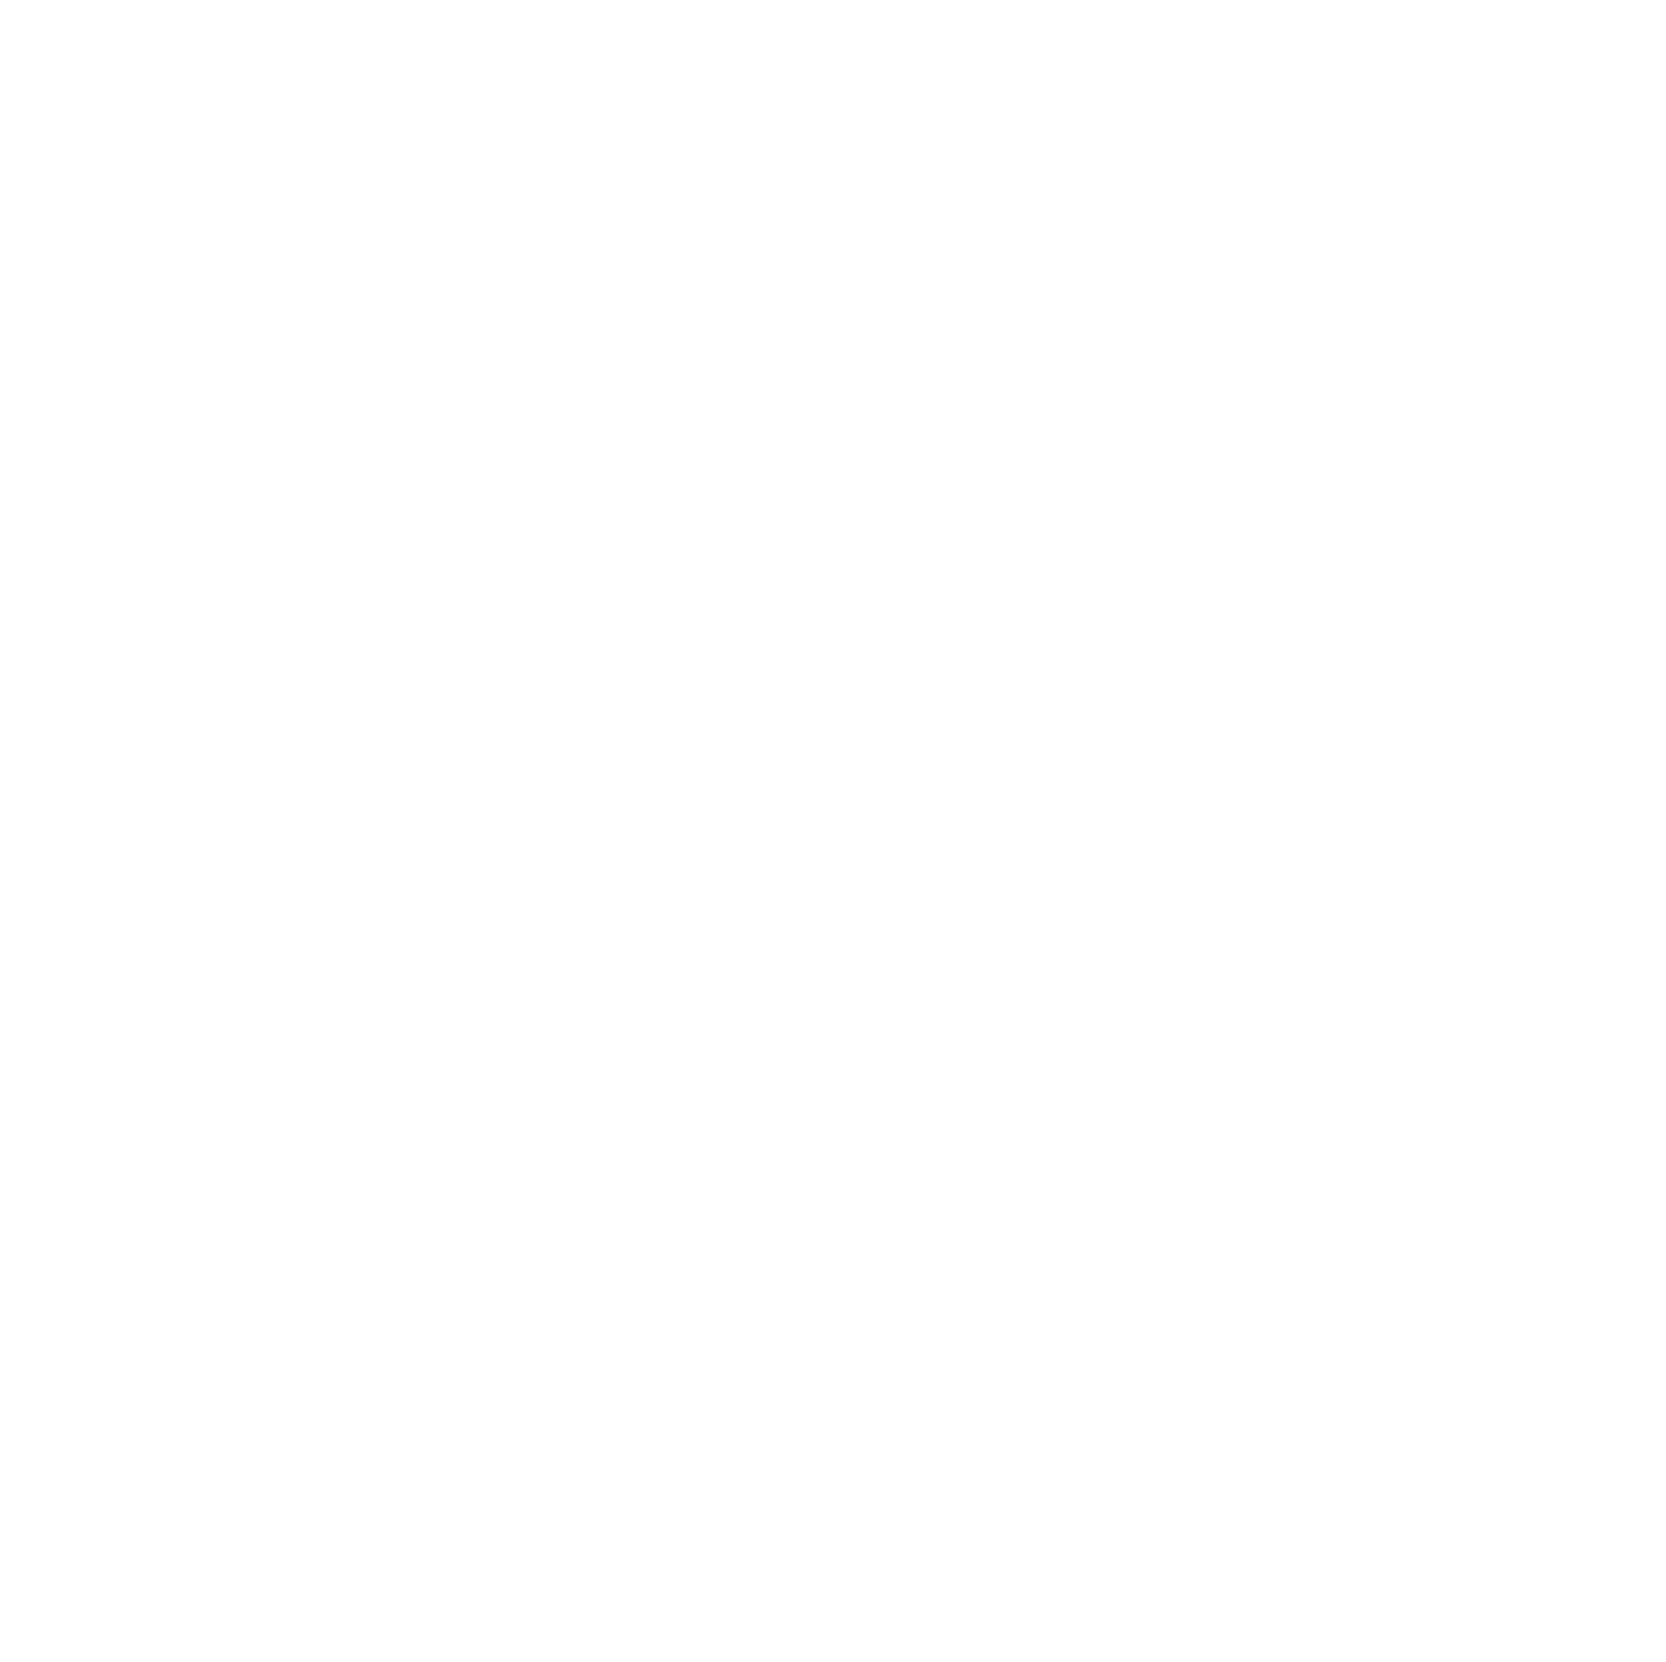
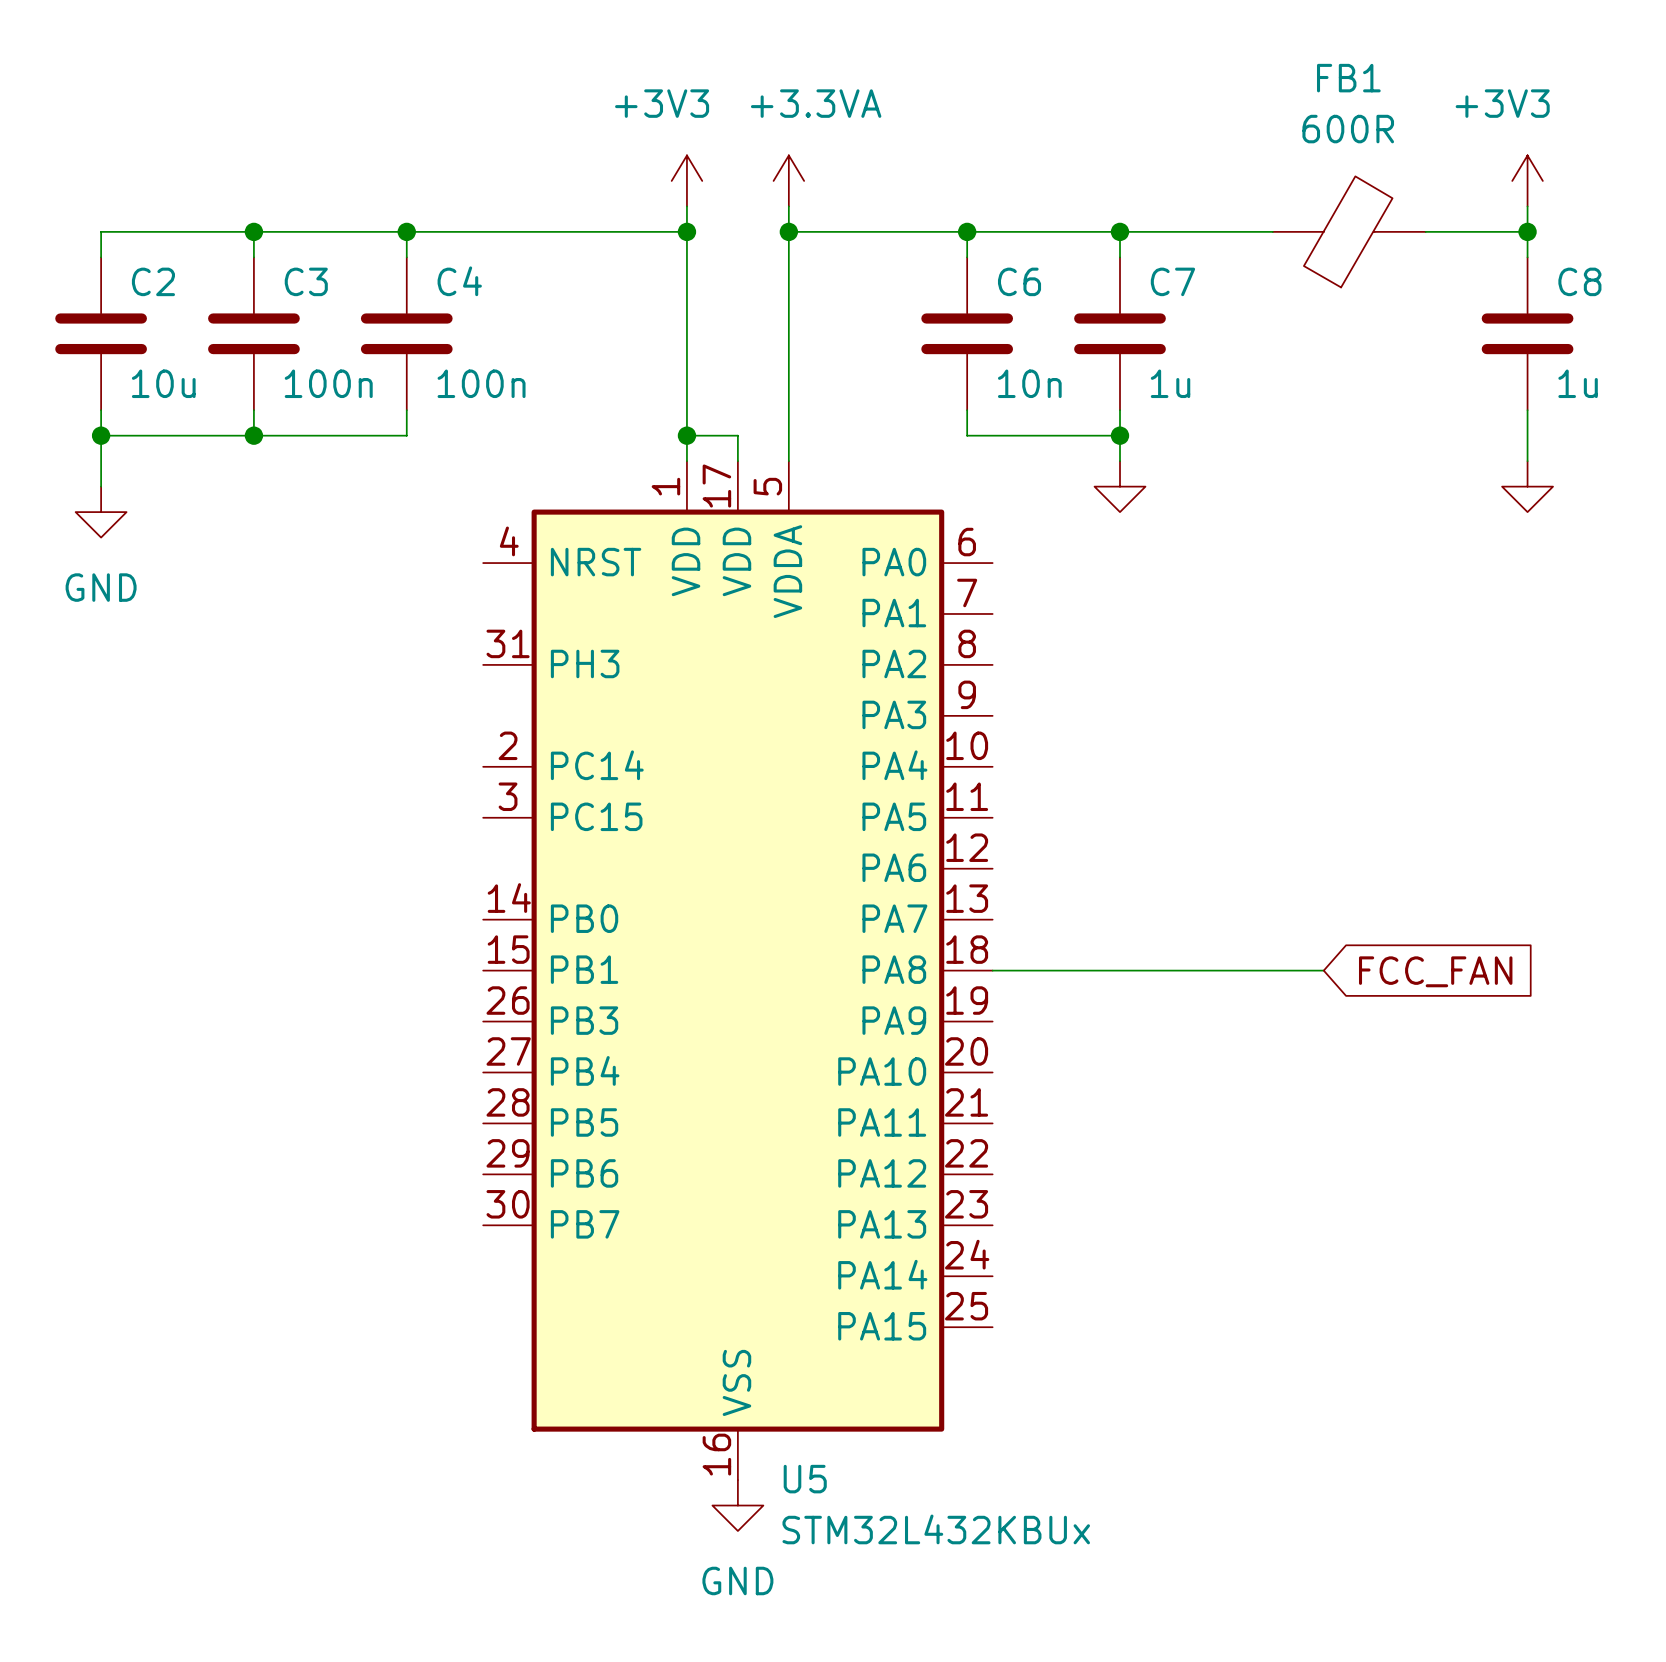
power symbol: none -> +3V3 (686, 180)
power symbol: none -> +3.3VA (788, 180)
power symbol: none -> +3V3 (1527, 180)
wire: none -> (686, 206) (686, 461)
wire: none -> (788, 206) (788, 461)
wire: none -> (1527, 206) (1527, 257)
wire: none -> (253, 231) (253, 257)
junction: none -> (253, 231)
wire: none -> (406, 231) (406, 257)
junction: none -> (406, 231)
wire: none -> (686, 231) (101, 231) (101, 257)
junction: none -> (686, 231)
wire: none -> (788, 231) (1272, 231)
junction: none -> (788, 231)
wire: none -> (967, 231) (967, 257)
junction: none -> (967, 231)
wire: none -> (1119, 231) (1119, 257)
junction: none -> (1119, 231)
FB1: none -> 600R (1349, 231)
wire: none -> (1425, 231) (1527, 231)
junction: none -> (1527, 231)
C2: none -> 10u (101, 333)
C3: none -> 100n (253, 333)
C4: none -> 100n (406, 333)
C6: none -> 10n (967, 333)
C7: none -> 1u (1119, 333)
C8: none -> 1u (1527, 333)
wire: none -> (101, 410) (101, 486)
wire: none -> (253, 410) (253, 435)
wire: none -> (406, 410) (406, 435) (101, 435)
wire: none -> (967, 410) (967, 435) (1119, 435)
wire: none -> (1119, 410) (1119, 461)
wire: none -> (1527, 410) (1527, 461)
junction: none -> (101, 435)
junction: none -> (253, 435)
wire: none -> (686, 435) (737, 435) (737, 461)
junction: none -> (686, 435)
junction: none -> (1119, 435)
power symbol: none -> (1119, 486)
power symbol: none -> (1527, 486)
power symbol: none -> GND (101, 512)
U5: none -> STM32L432KBUx (737, 970)
wire: none -> (992, 970) (1323, 970)
global label: none -> FCC_FAN (1435, 971)
power symbol: none -> GND (737, 1505)

